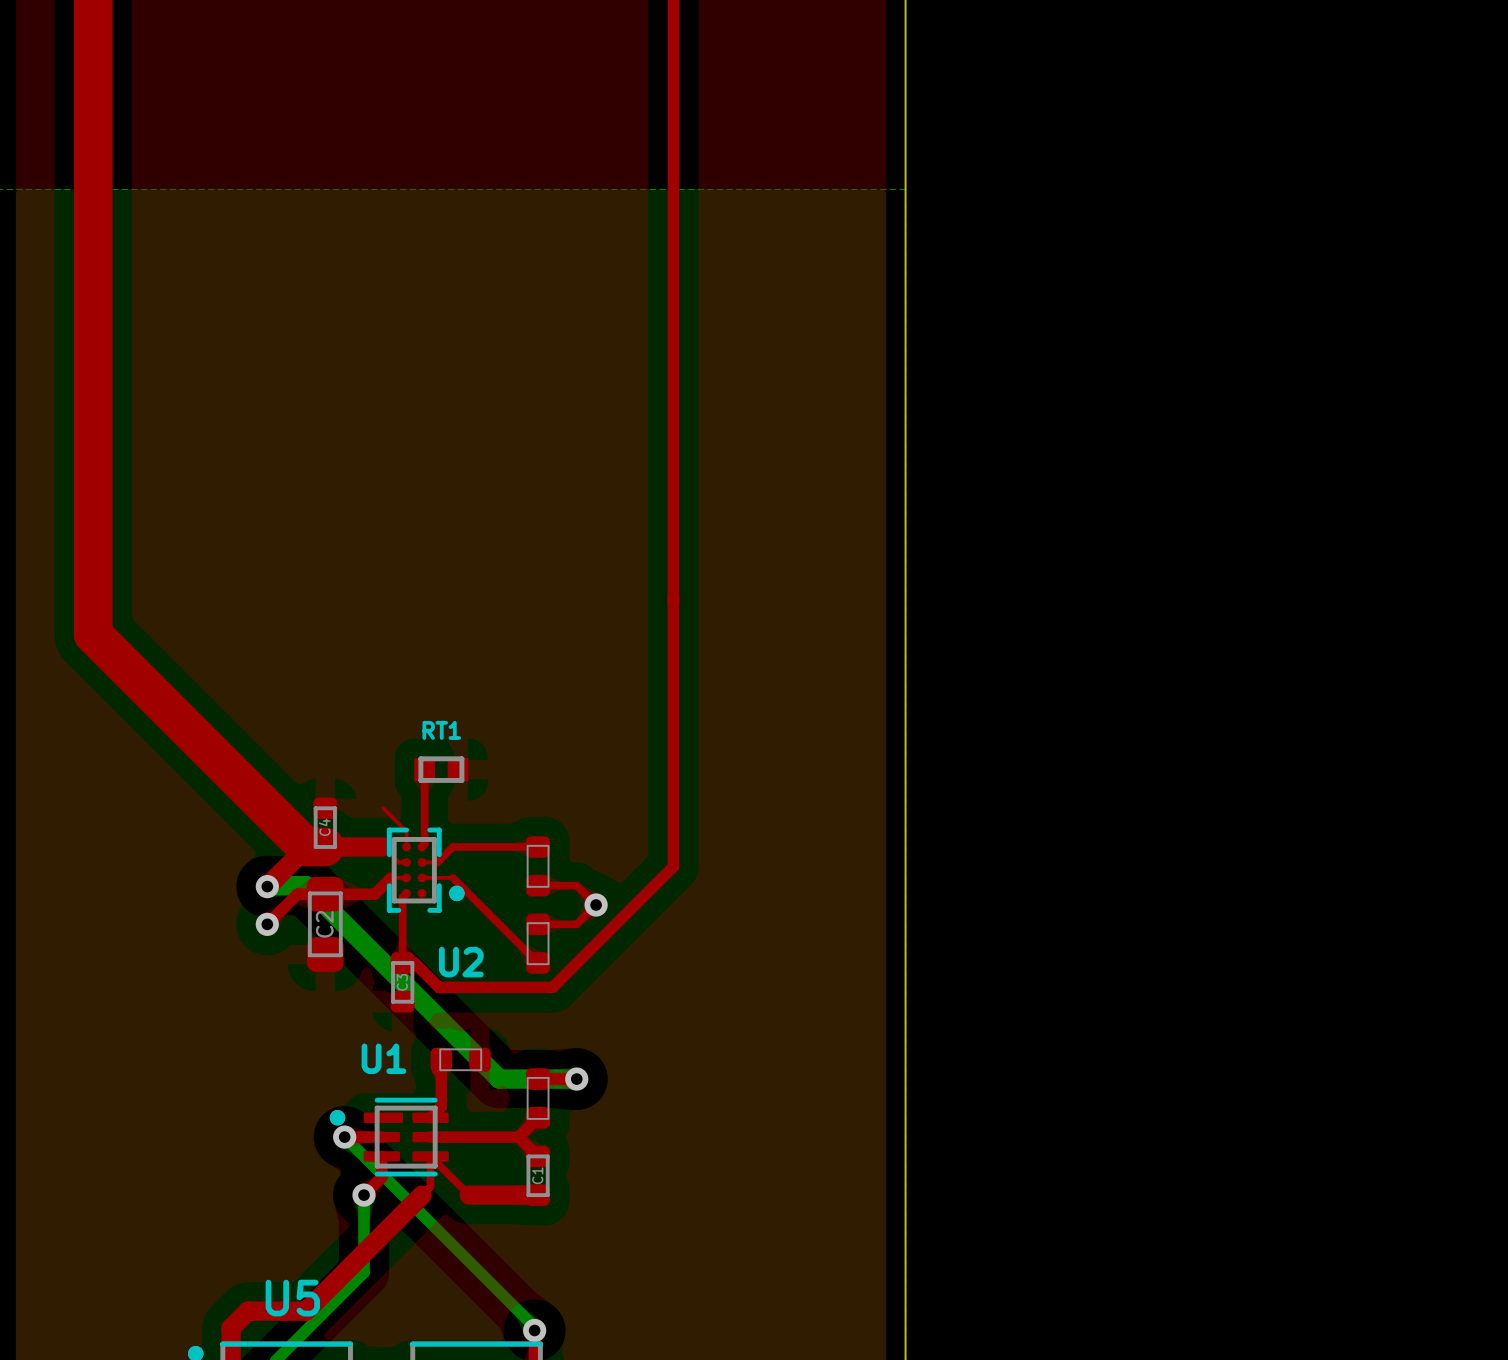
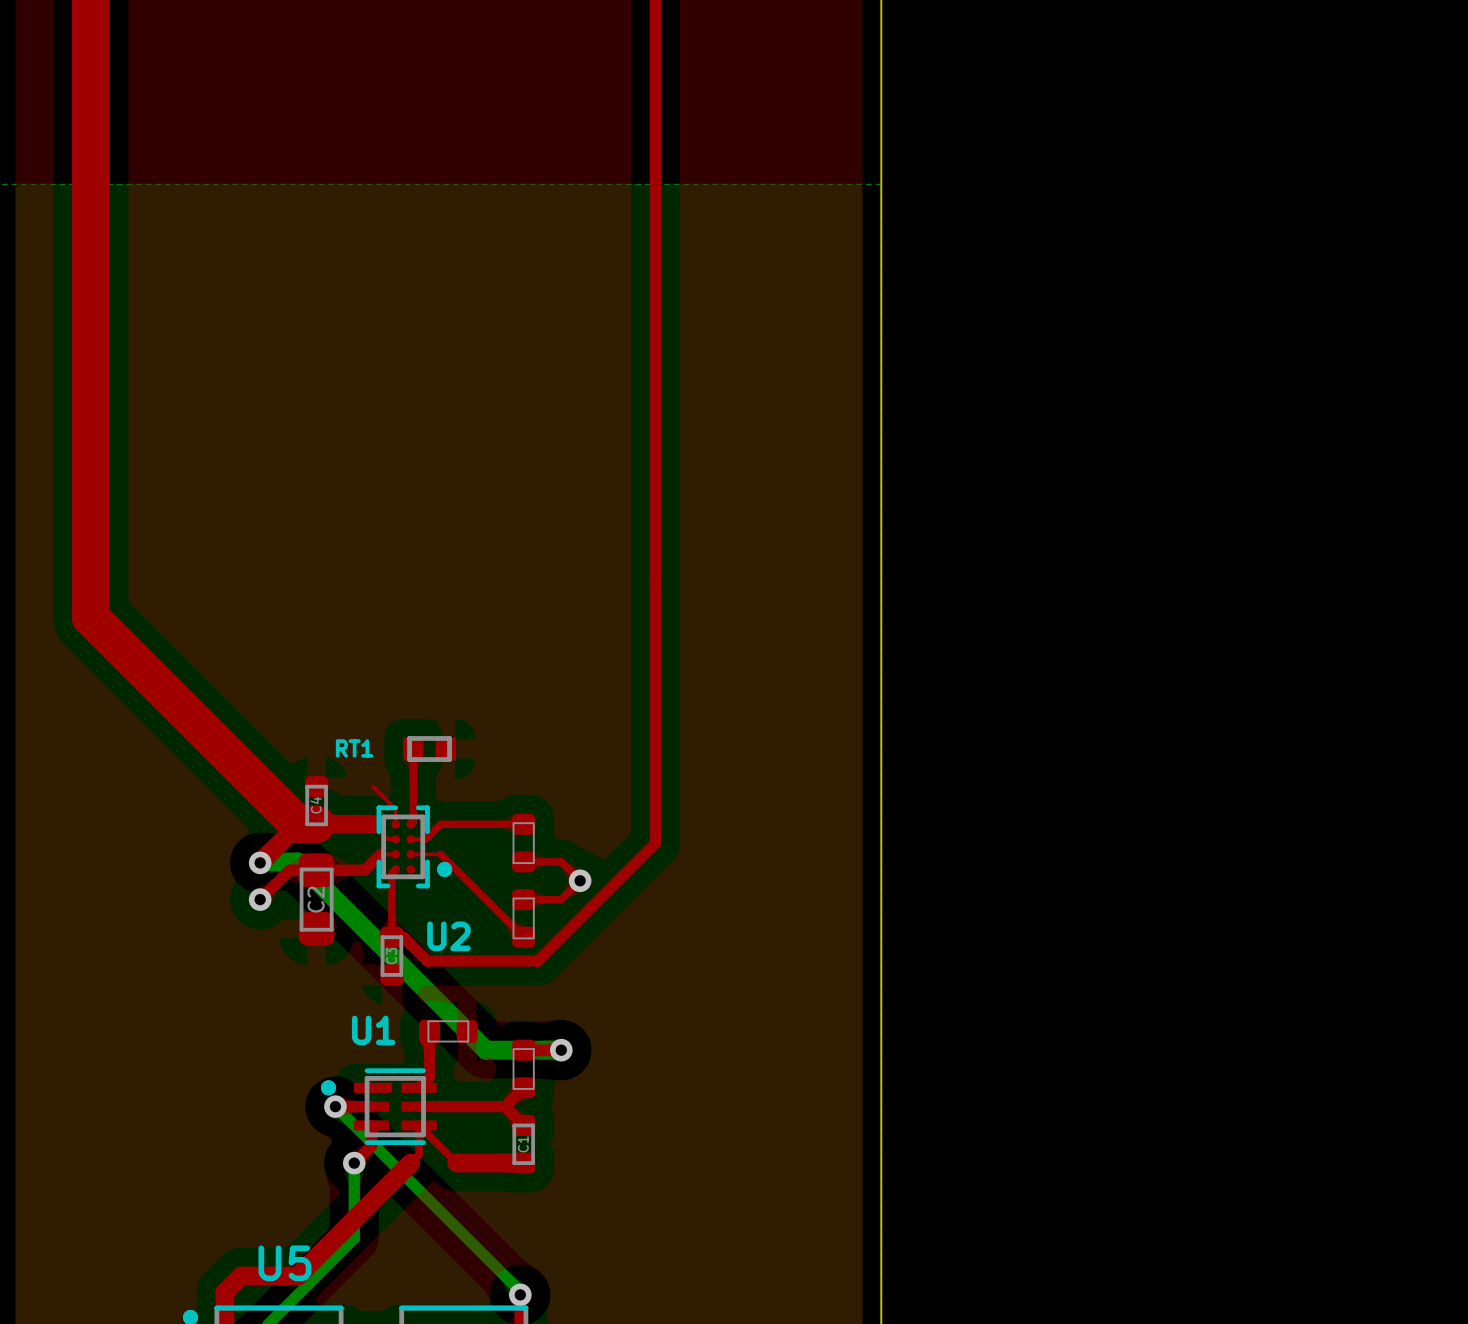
RT1 name position: RT1 (441, 730) -> RT1 (354, 748)

